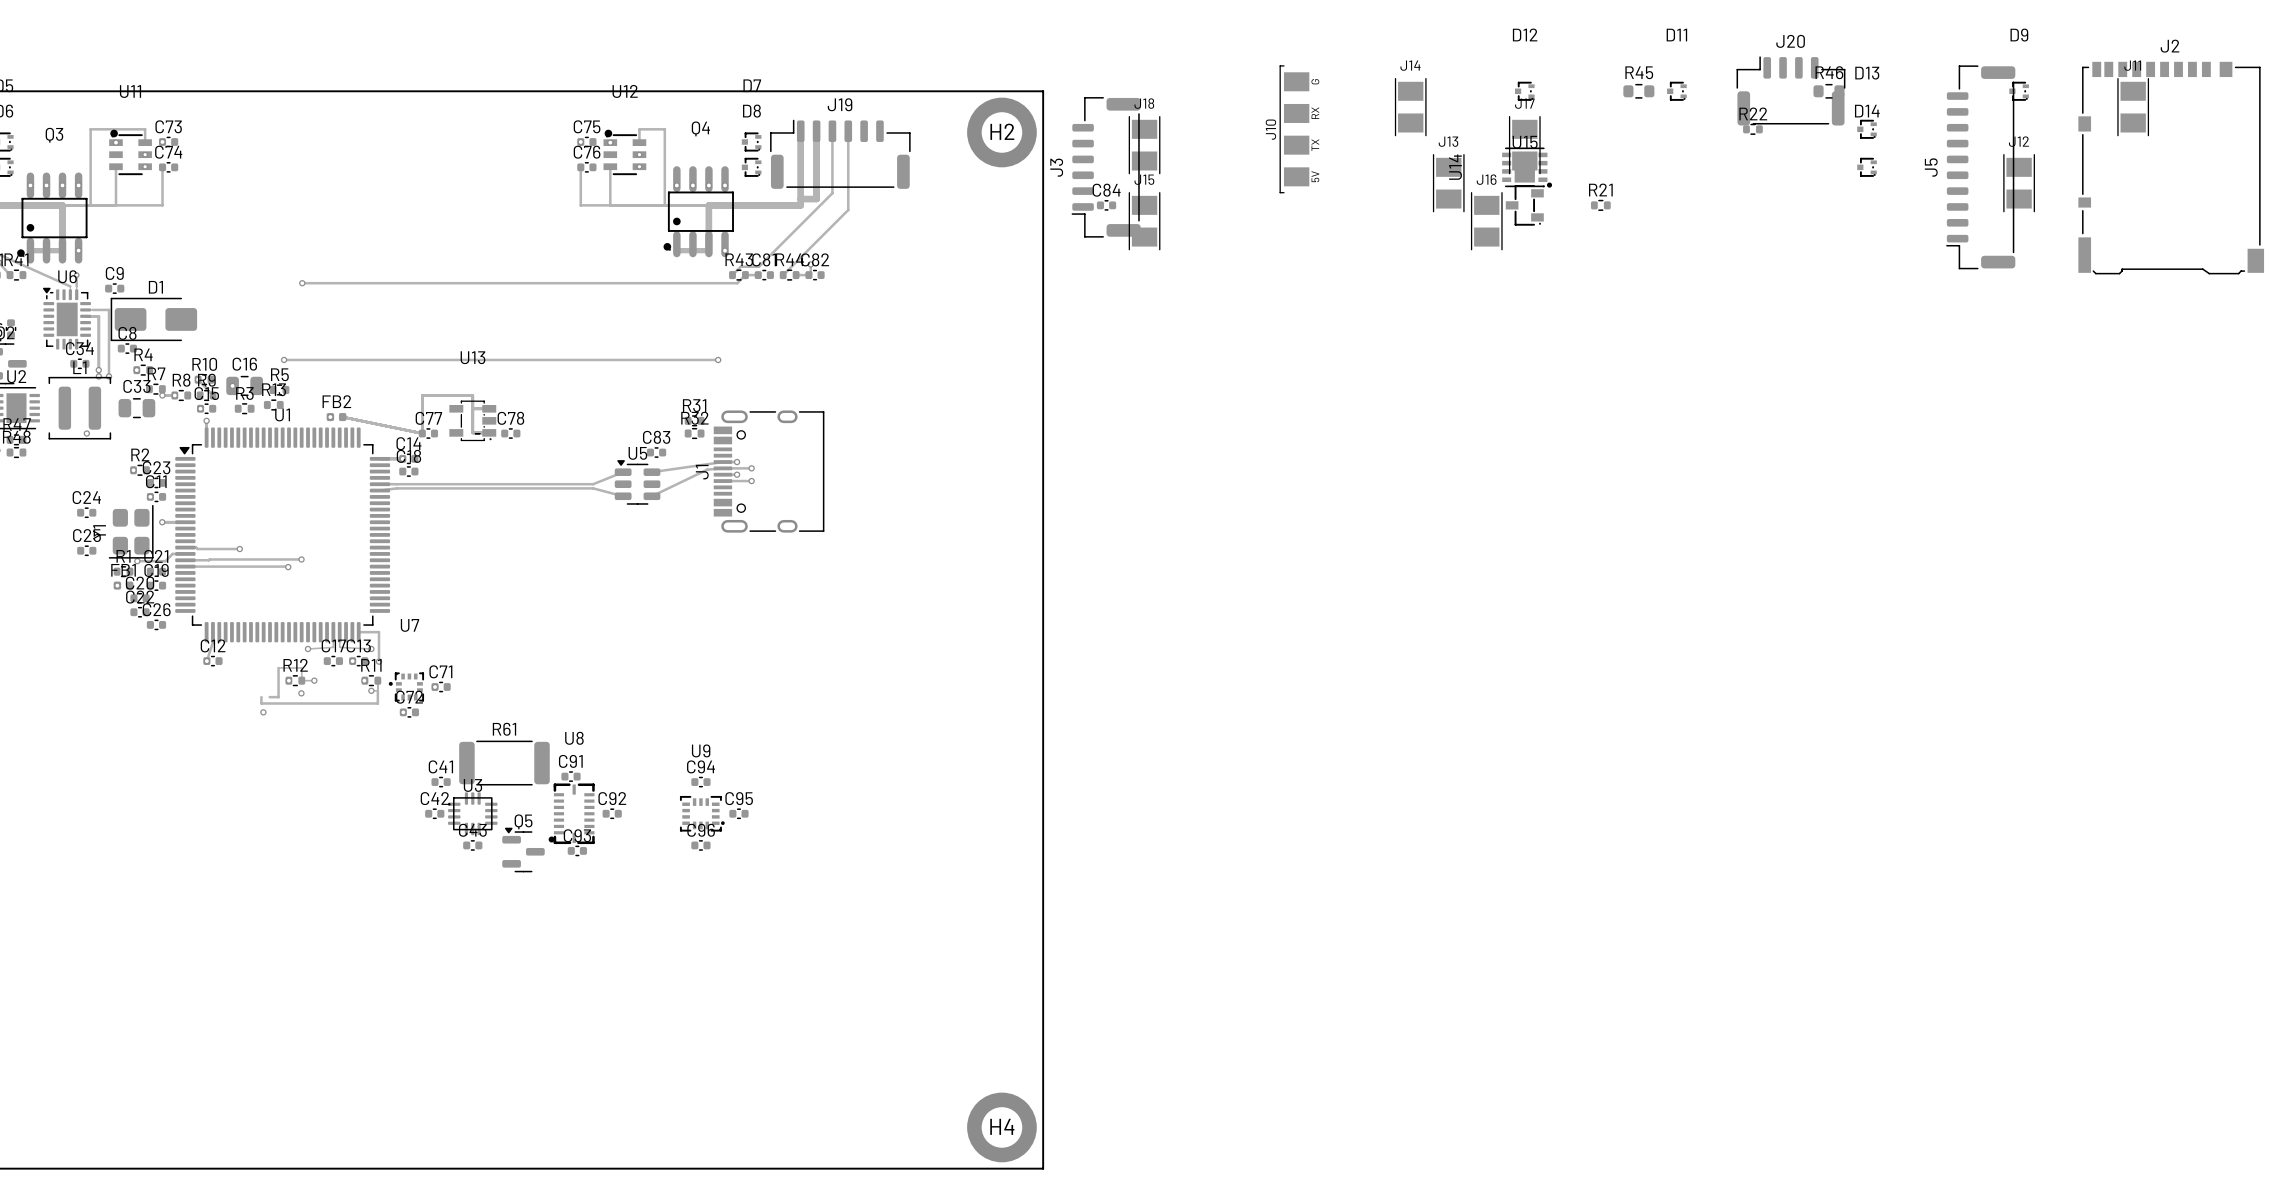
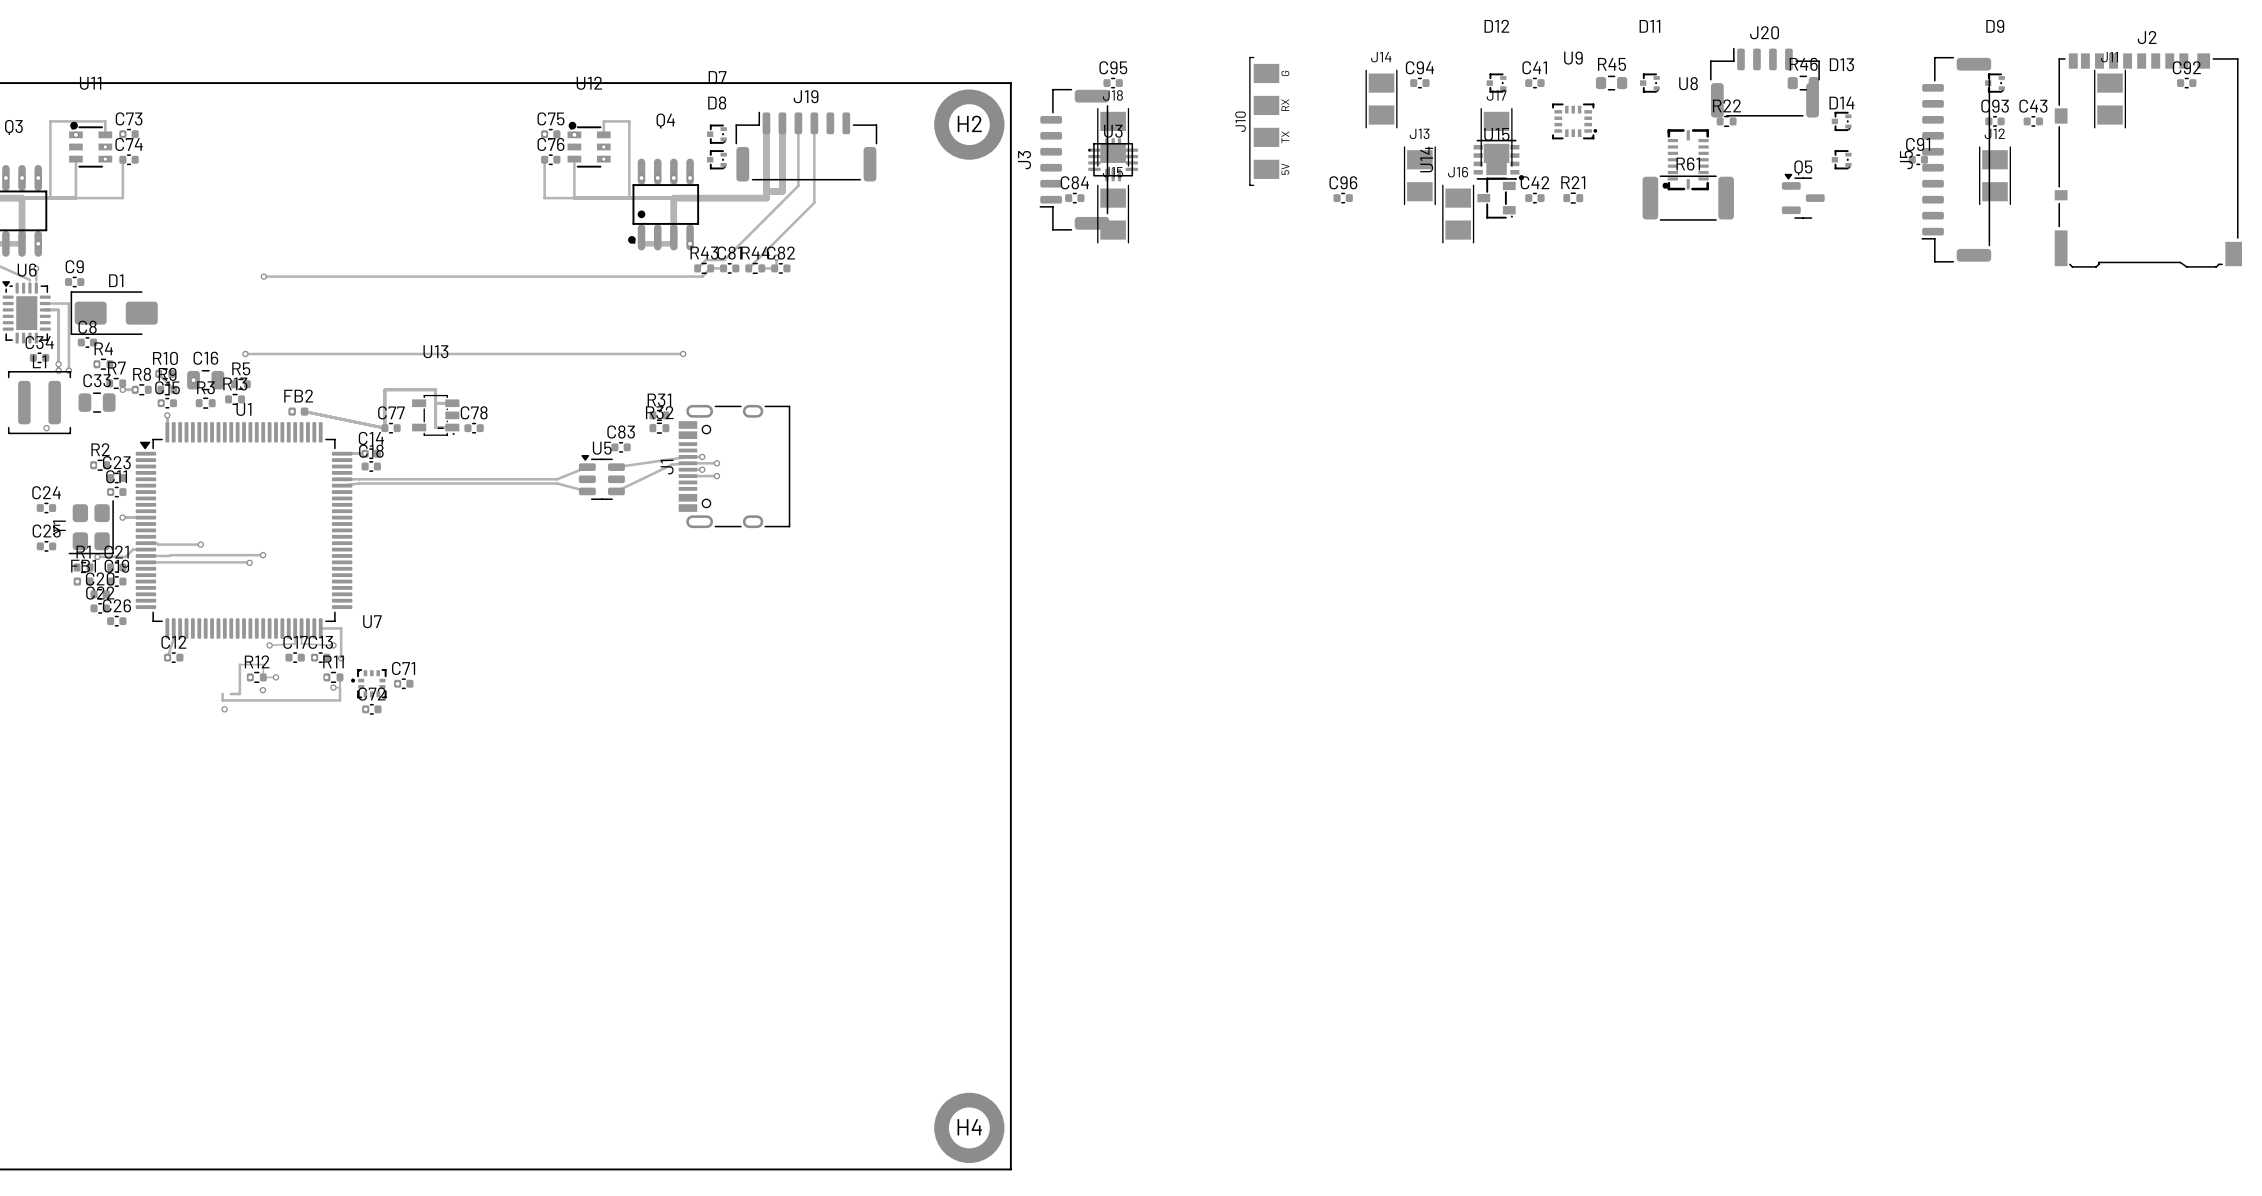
R61 position: (504, 763) -> (1688, 198)
C91 position: (571, 776) -> (1918, 159)
C41 position: (441, 782) -> (1534, 83)
C94 position: (700, 782) -> (1419, 83)
C42 position: (434, 813) -> (1534, 198)
U3 position: (472, 813) -> (1113, 159)
U8 position: (571, 813) -> (1685, 159)
C92 position: (612, 813) -> (2186, 83)
U9 position: (702, 813) -> (1574, 121)
C95 position: (738, 813) -> (1113, 83)
C43 position: (472, 845) -> (2033, 121)
C96 position: (700, 845) -> (1343, 198)
Q5 position: (523, 850) -> (1803, 196)
C93 position: (577, 850) -> (1995, 121)

